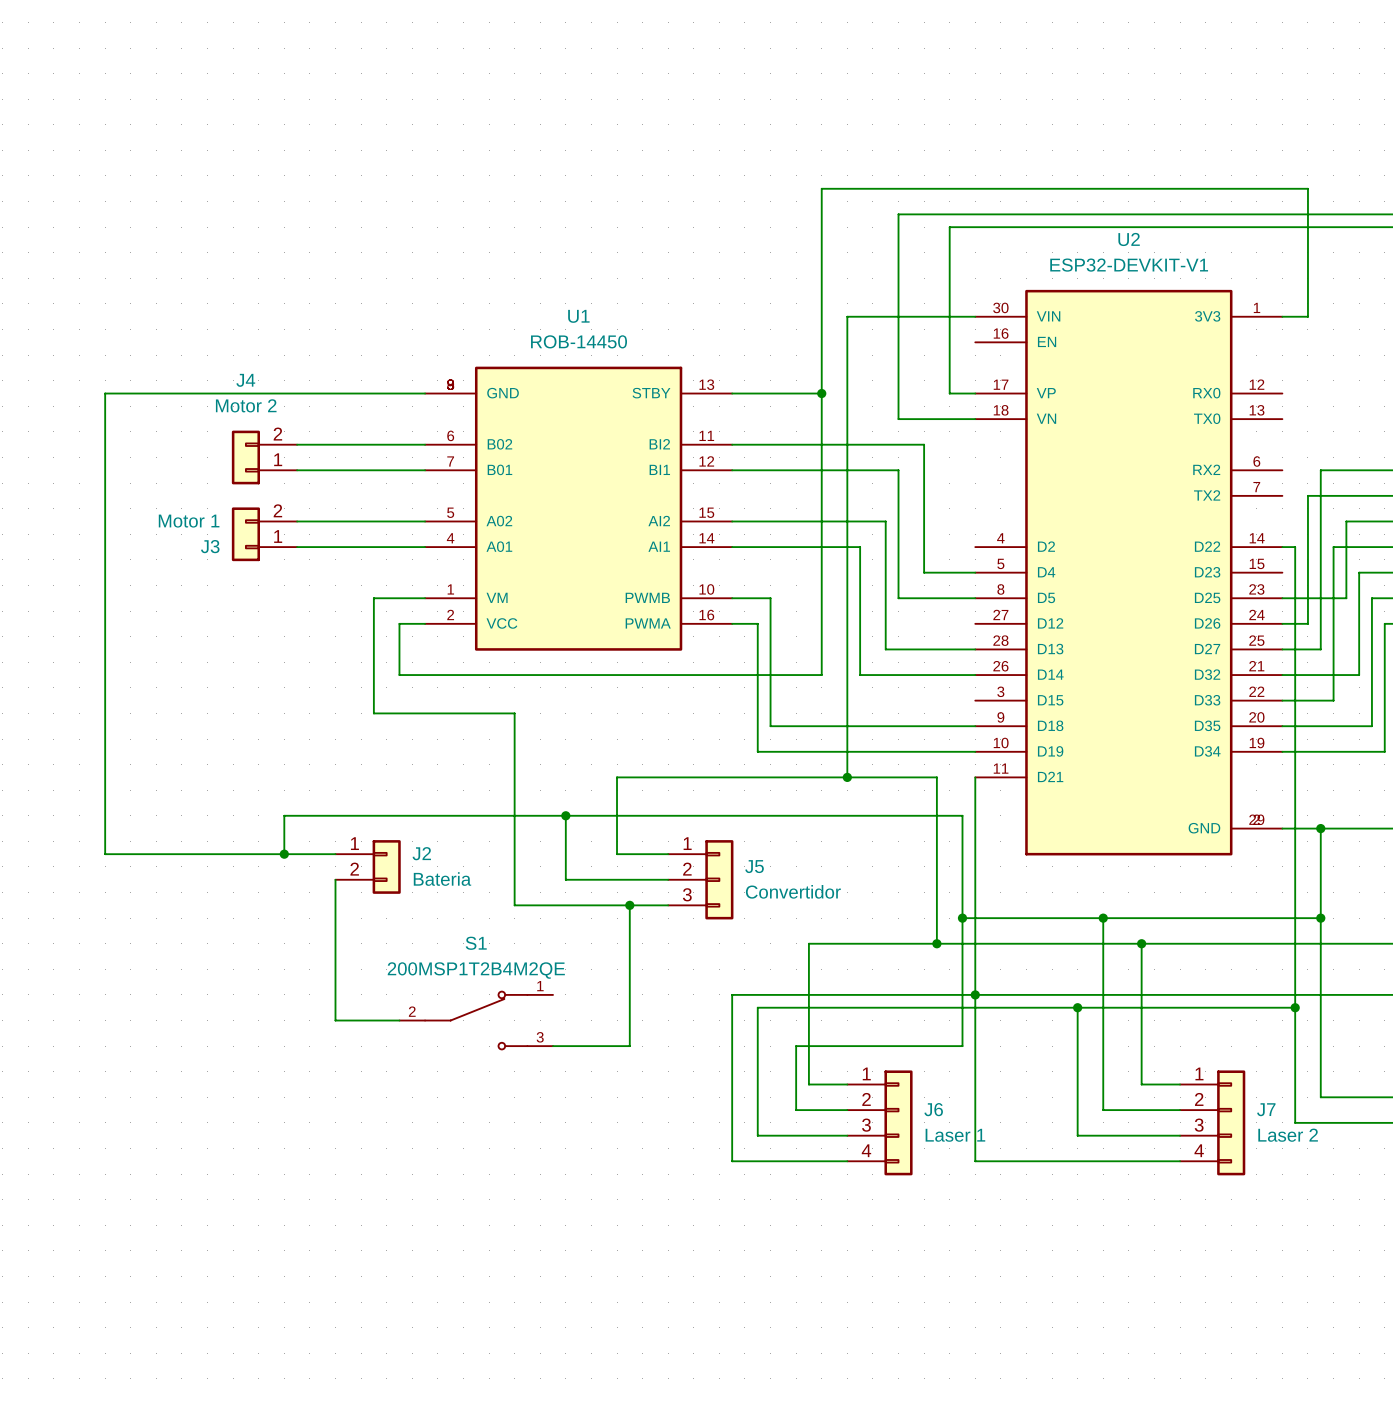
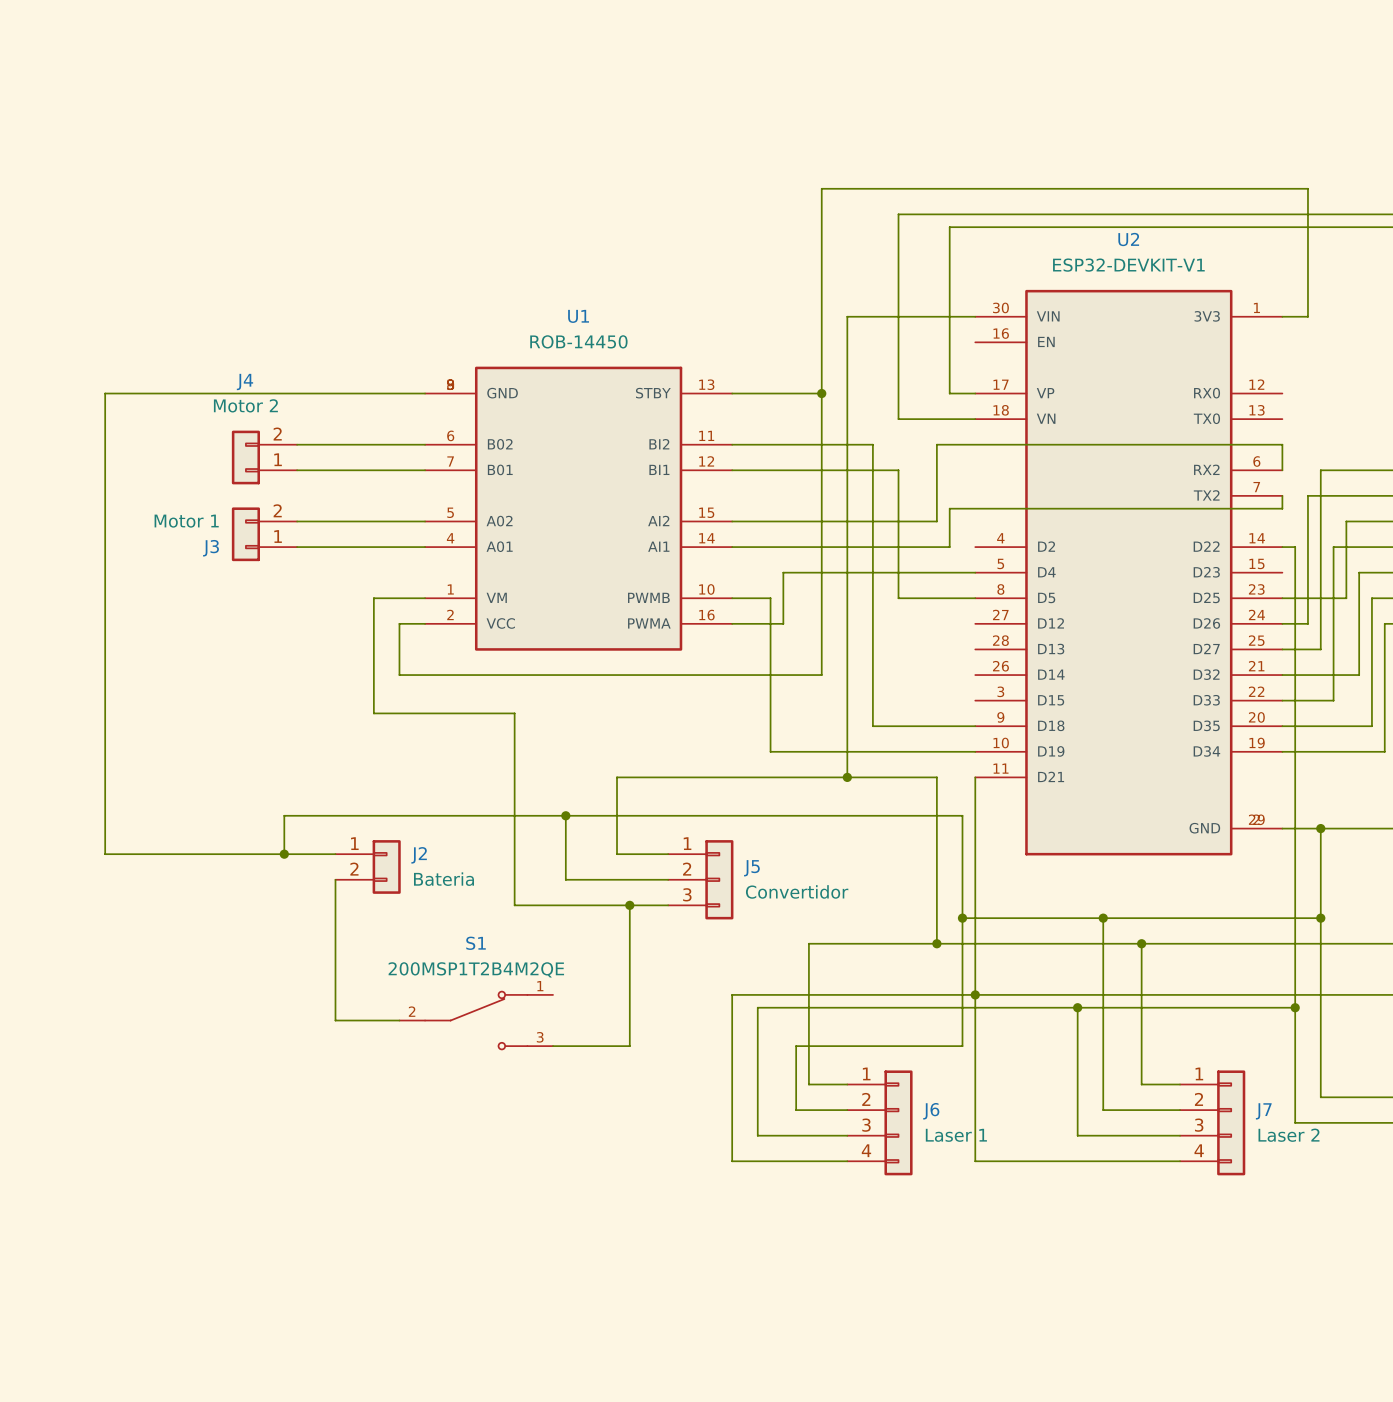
wire: (872, 444) (924, 444) (924, 572) -> (872, 444) (872, 726)
wire: (885, 521) (885, 649) (975, 649) -> (885, 521) (936, 521) (936, 444) (1282, 444) (1282, 470)
wire: (860, 547) (860, 675) (975, 675) -> (860, 547) (949, 547) (949, 508) (1282, 508) (1282, 495)
wire: none -> (924, 572) (783, 572) (783, 623) (757, 623)
wire: (757, 623) (757, 751) (770, 751) -> (770, 726) (770, 751)
wire: (770, 726) (872, 726) -> none

